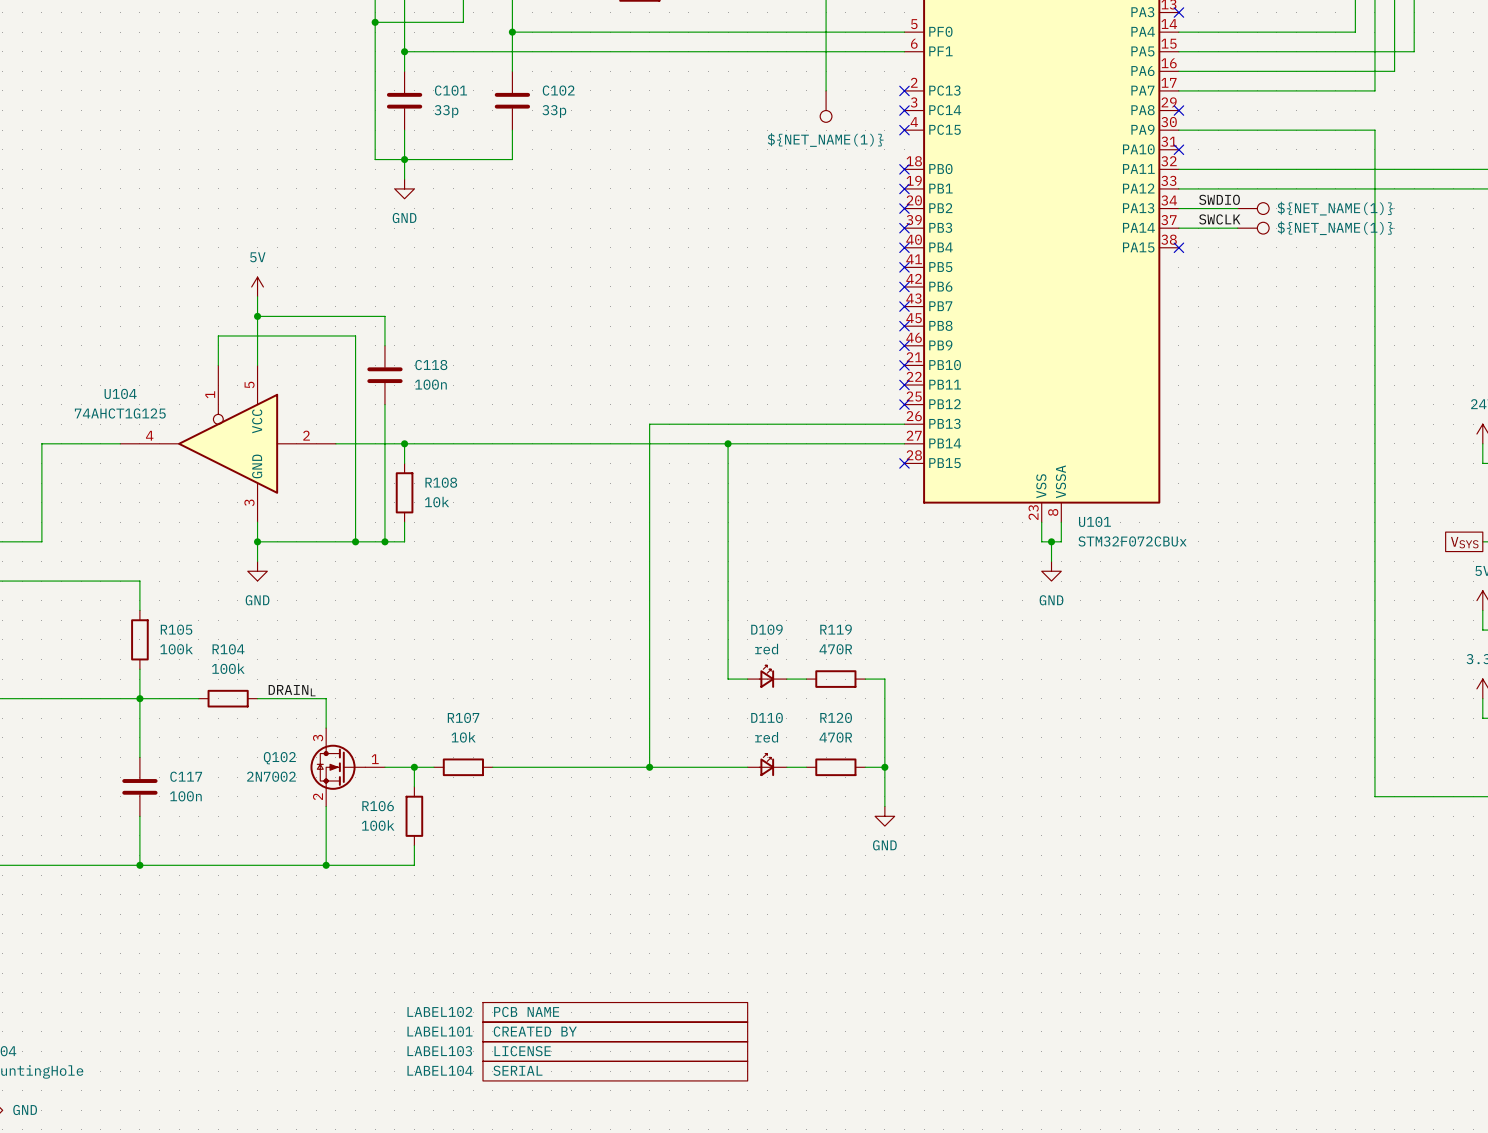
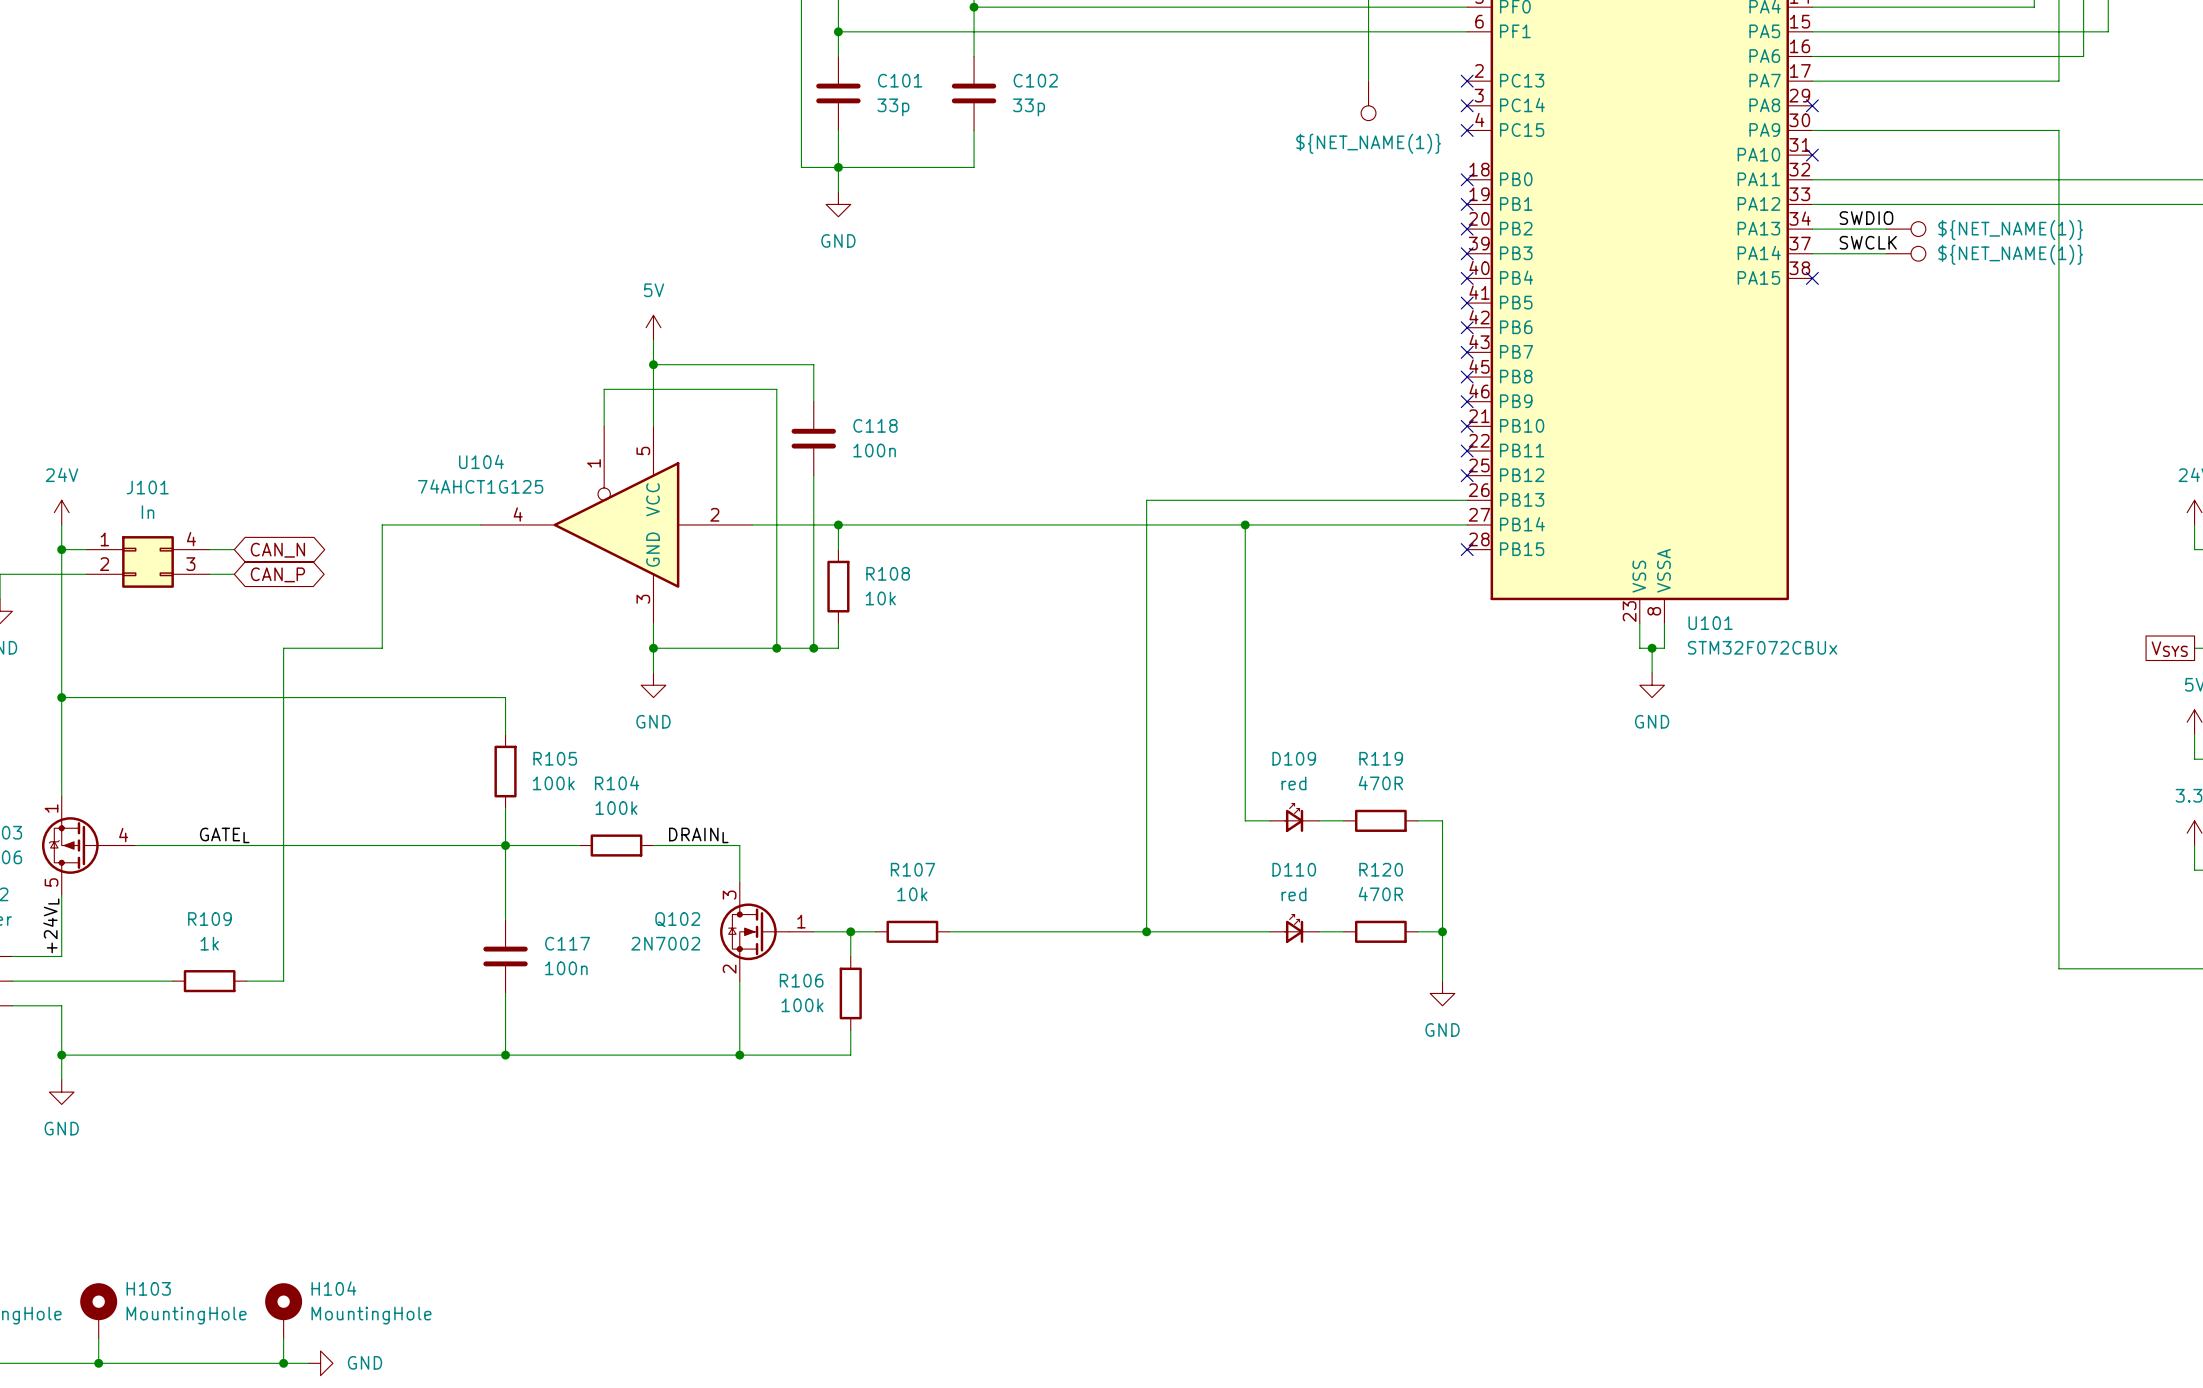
LABEL102: PCB NAME (615, 1012) -> none
LABEL101: CREATED BY (615, 1031) -> none
LABEL103: LICENSE (615, 1051) -> none
LABEL104: SERIAL (615, 1071) -> none

